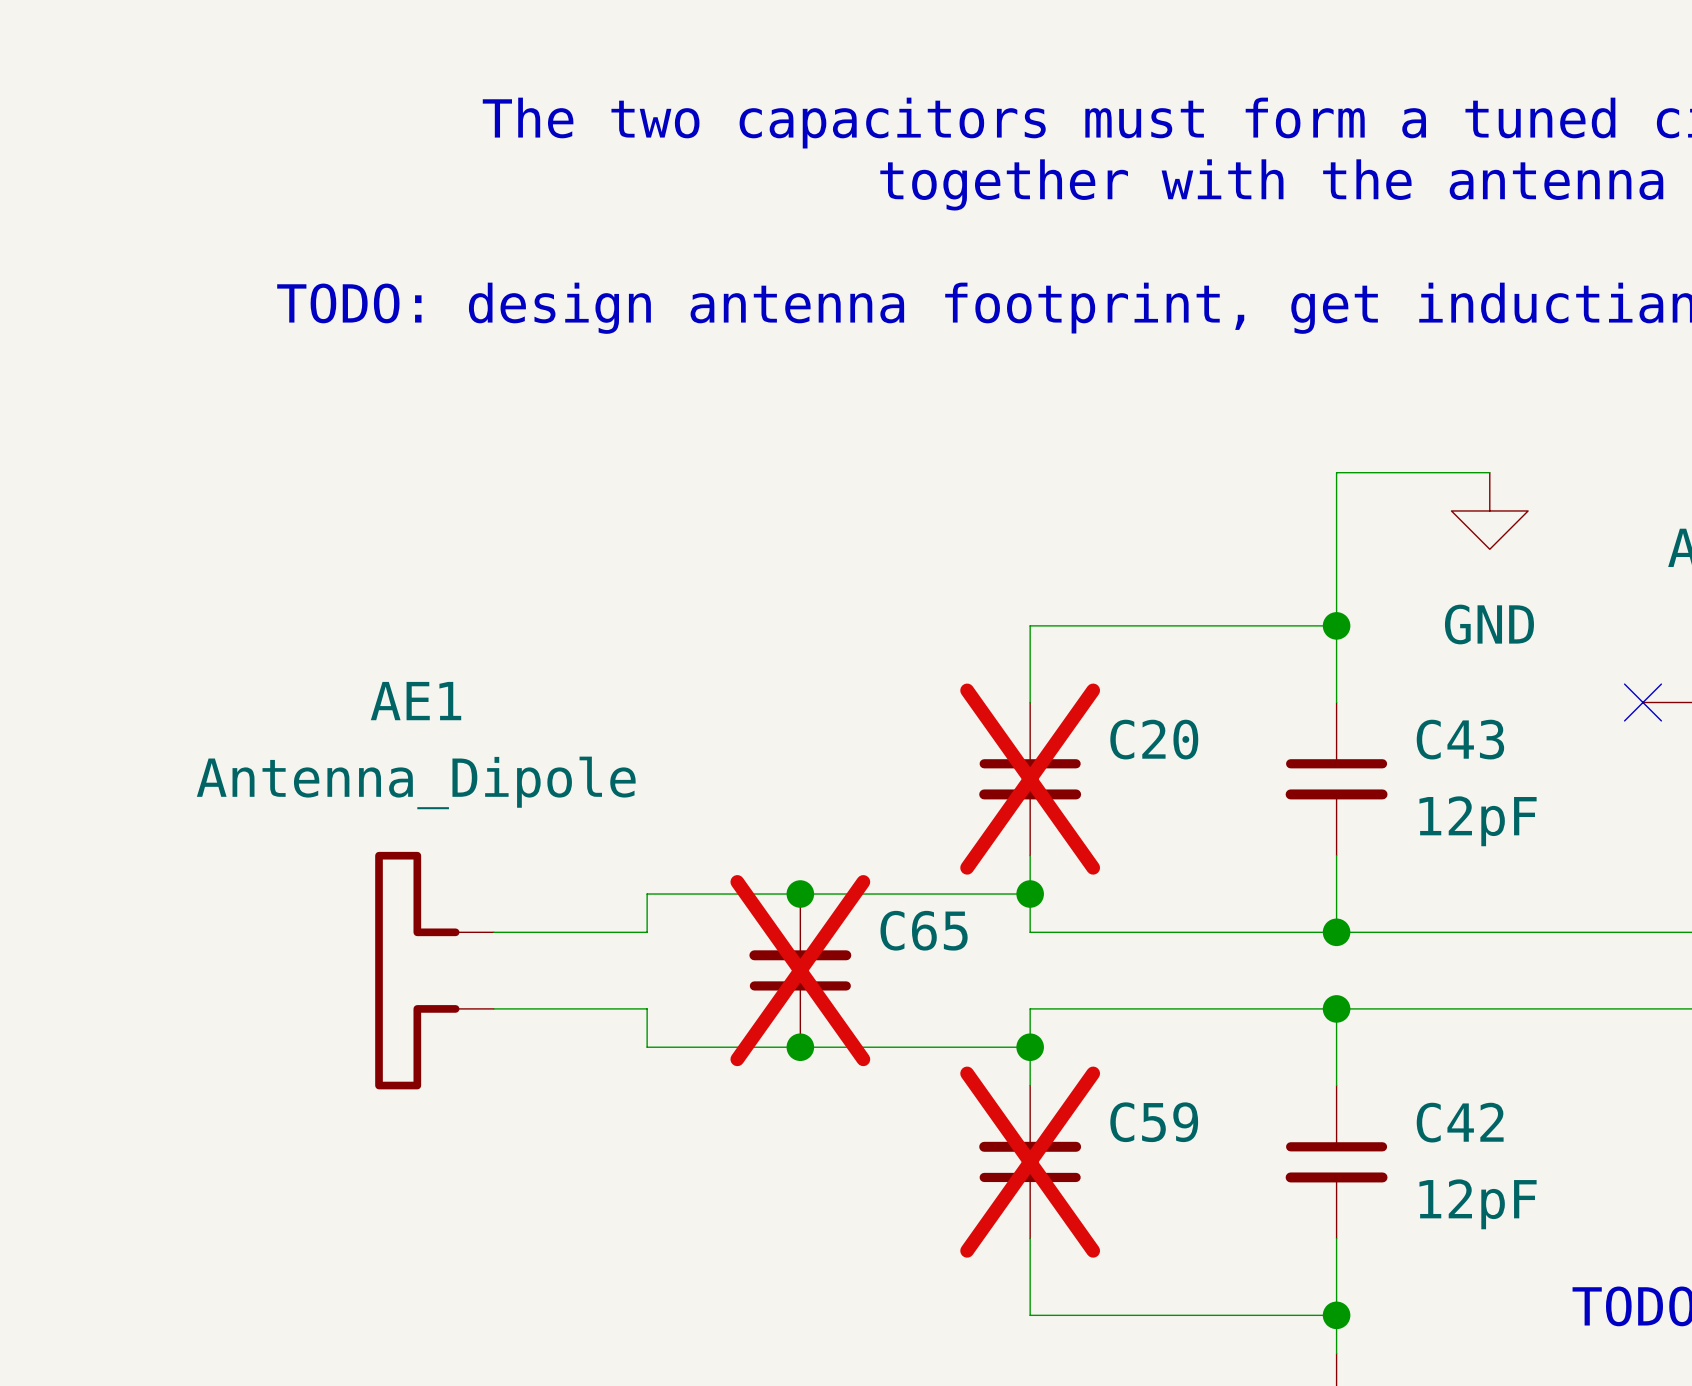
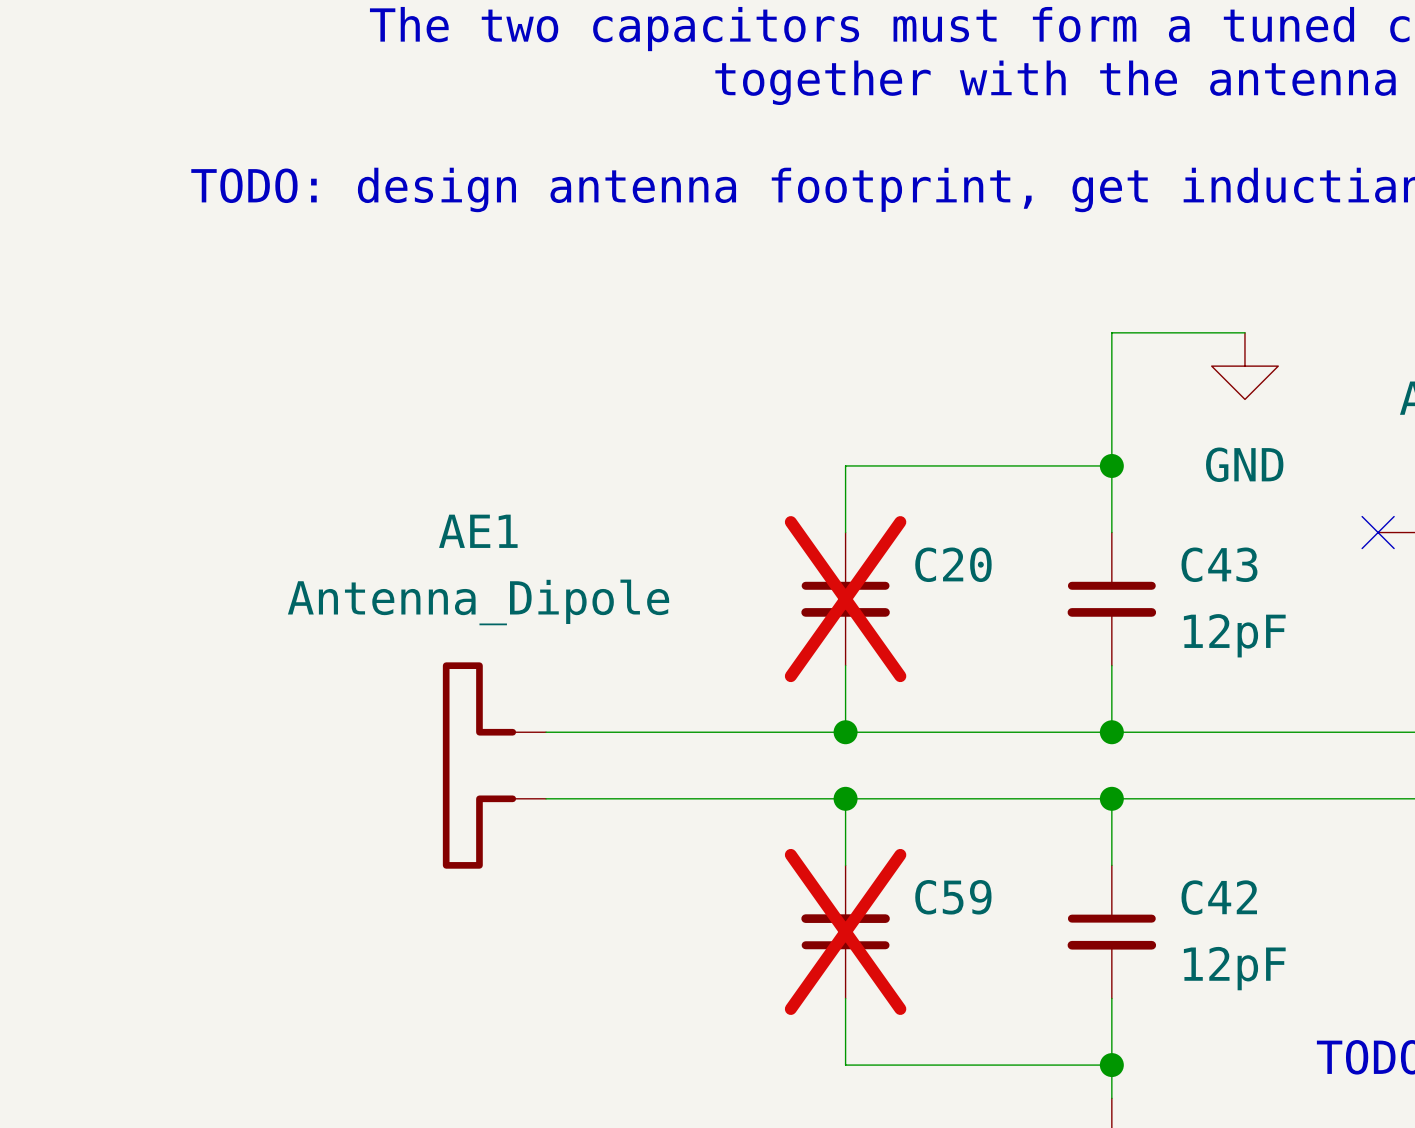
junction: (800, 894) -> none
wire: (1030, 894) (647, 894) (647, 932) (493, 932) -> none
junction position: (1030, 894) -> (845, 732)
wire: none -> (546, 732) (845, 732)
AE1 position: (434, 970) -> (494, 765)
C65: (800, 970) -> none
wire: (493, 1008) (647, 1008) (647, 1047) (1030, 1047) -> none
wire: none -> (546, 798) (845, 798)
junction: (800, 1047) -> none
junction position: (1030, 1047) -> (845, 798)

